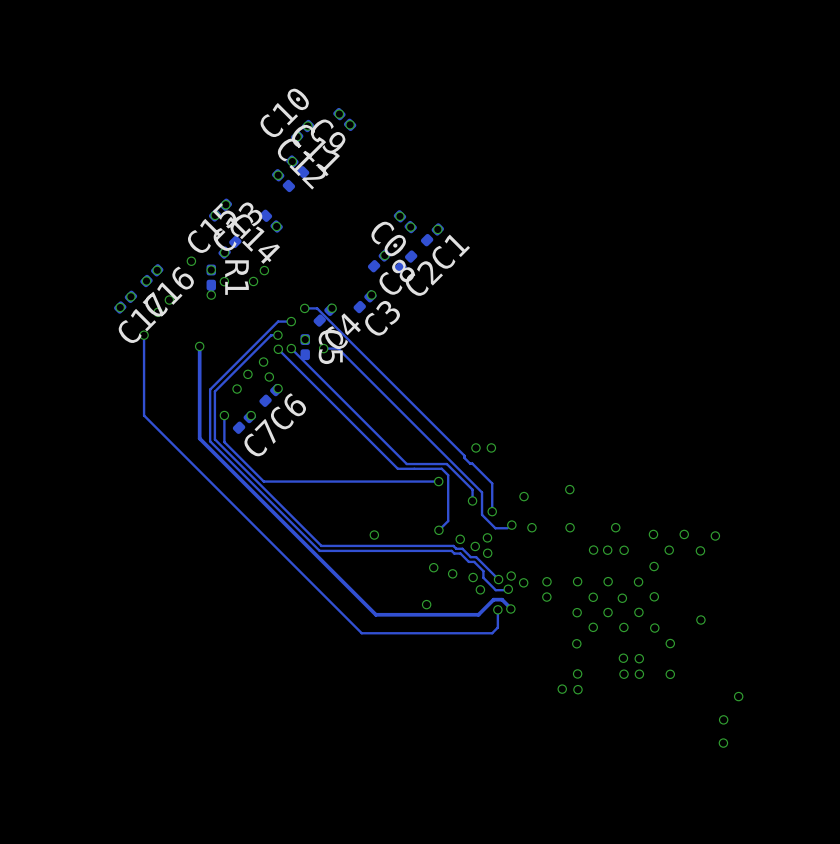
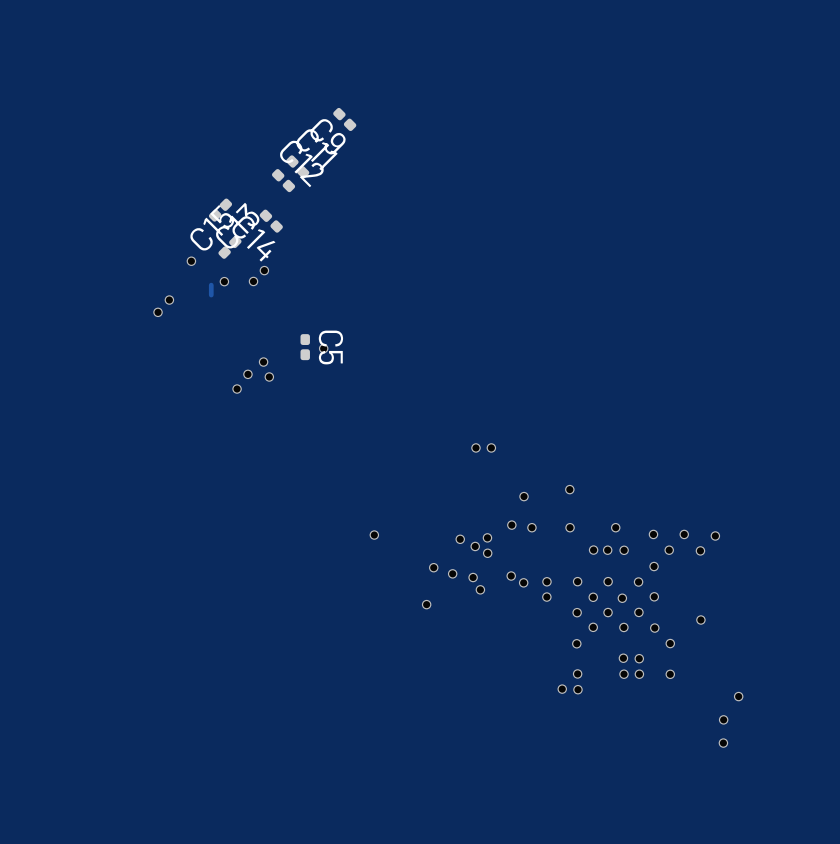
via: (339, 114) -> none
via: (350, 124) -> none
via: (307, 126) -> none
C10: (302, 131) -> none
via: (297, 136) -> none
via: (292, 161) -> none
via: (278, 175) -> none
via: (225, 204) -> none
via: (215, 215) -> none
via: (399, 216) -> none
C0: (405, 221) -> none
via: (276, 226) -> none
via: (410, 227) -> none
via: (437, 229) -> none
C1: (432, 234) -> none
via: (224, 252) -> none
via: (384, 255) -> none
C8: (379, 260) -> none
C2: (405, 261) -> none
via: (211, 269) -> none
via: (157, 270) -> none
C16: (151, 275) -> none
R1: (211, 277) -> none
via: (146, 281) -> none
via: (211, 295) -> none
via: (371, 295) -> none
via: (130, 296) -> none
C3: (365, 301) -> none
C17: (125, 302) -> none
via: (120, 307) -> none
track: (304, 308) (317, 308) (464, 455) (464, 458) (492, 483) (492, 511) -> none
via: (304, 308) -> none
via: (332, 308) -> none
C4: (325, 315) -> none
track: (291, 321) (278, 321) (210, 389) (210, 441) (319, 550) (451, 550) (454, 553) (460, 553) (468, 561) (474, 561) (483, 571) (483, 577) (495, 590) (508, 589) -> none
via: (291, 321) -> none
track: (144, 335) (144, 415) (361, 633) (492, 633) (497, 627) (497, 609) -> none
via: (144, 335) -> none
track: (277, 335) (271, 335) (214, 391) (214, 439) (321, 545) (453, 545) (456, 548) (462, 548) (470, 557) (476, 557) (498, 579) -> none
via: (277, 335) -> none
via: (305, 339) -> none
track: (199, 346) (199, 438) (375, 614) (478, 614) (493, 599) (502, 599) (510, 609) -> none
via: (199, 346) -> none
track: (291, 348) (406, 464) (446, 464) (472, 489) (472, 500) -> none
via: (291, 348) -> none
track: (323, 348) (338, 348) (482, 492) (482, 514) (495, 528) (507, 528) -> none
track: (278, 349) (397, 468) (441, 468) (448, 475) (448, 521) (438, 530) -> none
via: (278, 349) -> none
via: (278, 388) -> none
C6: (270, 395) -> none
track: (224, 415) (224, 442) (263, 481) (438, 481) -> none
via: (224, 415) -> none
via: (251, 415) -> none
C7: (244, 422) -> none
via: (438, 481) -> none
via: (472, 500) -> none
via: (492, 511) -> none
via: (438, 530) -> none
via: (498, 579) -> none
via: (508, 589) -> none
via: (497, 609) -> none
via: (510, 609) -> none

